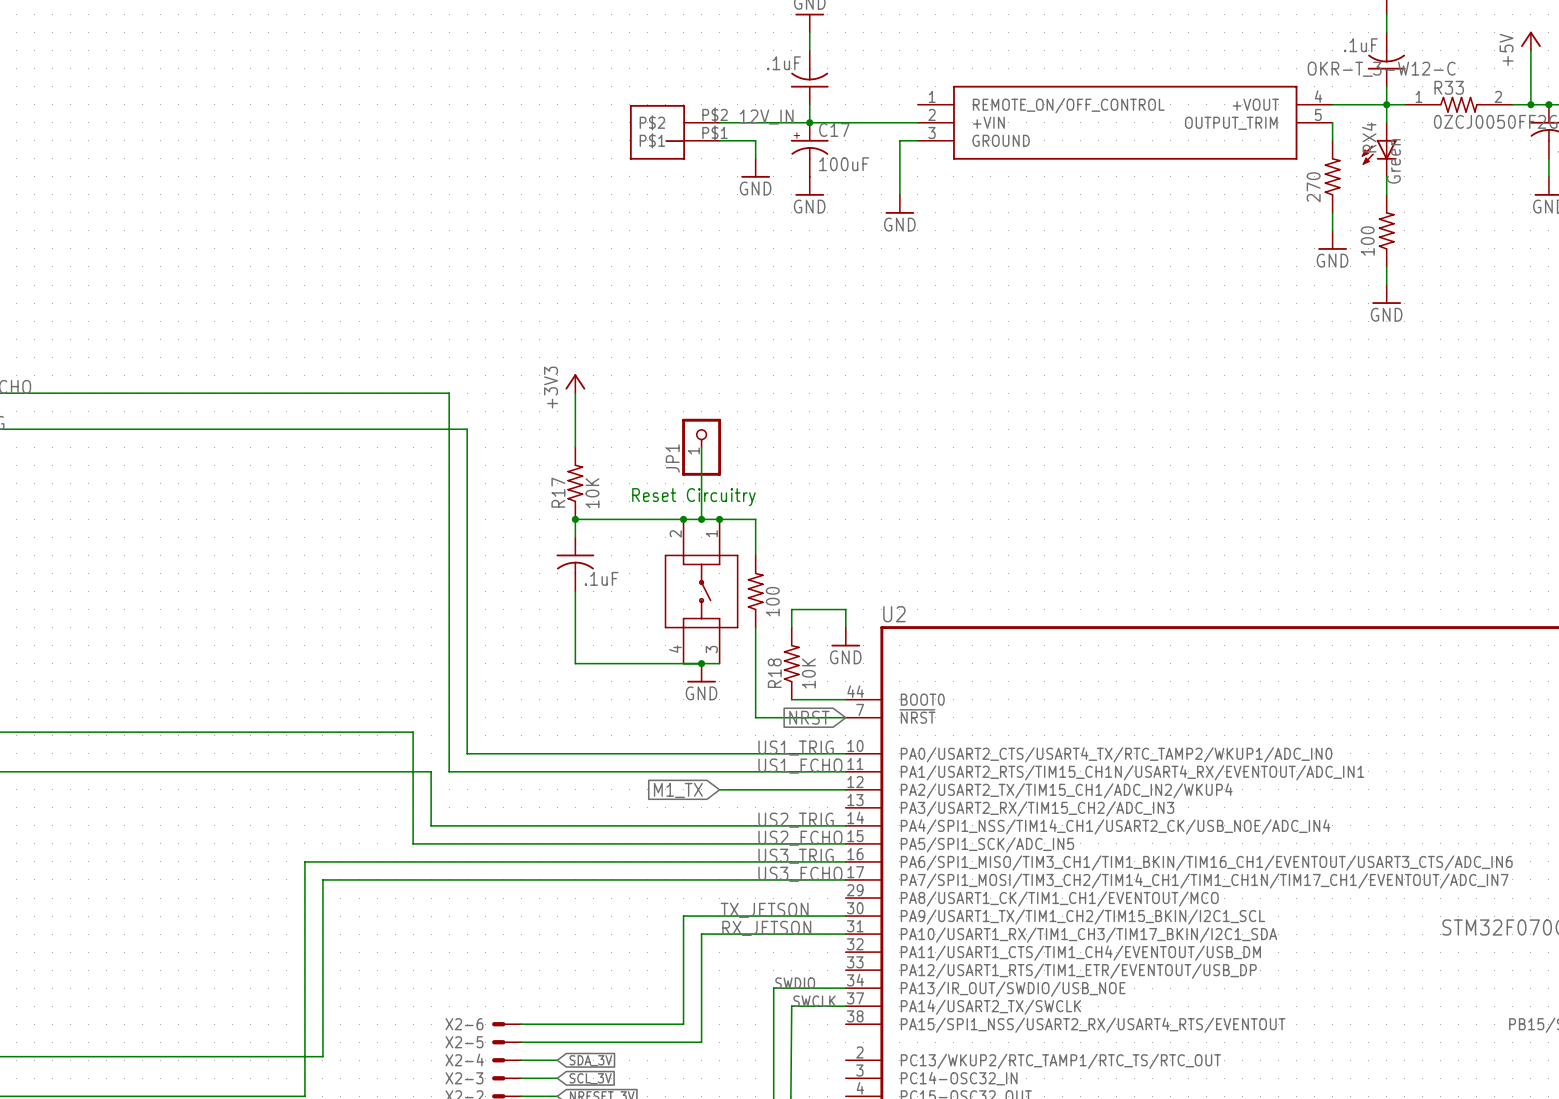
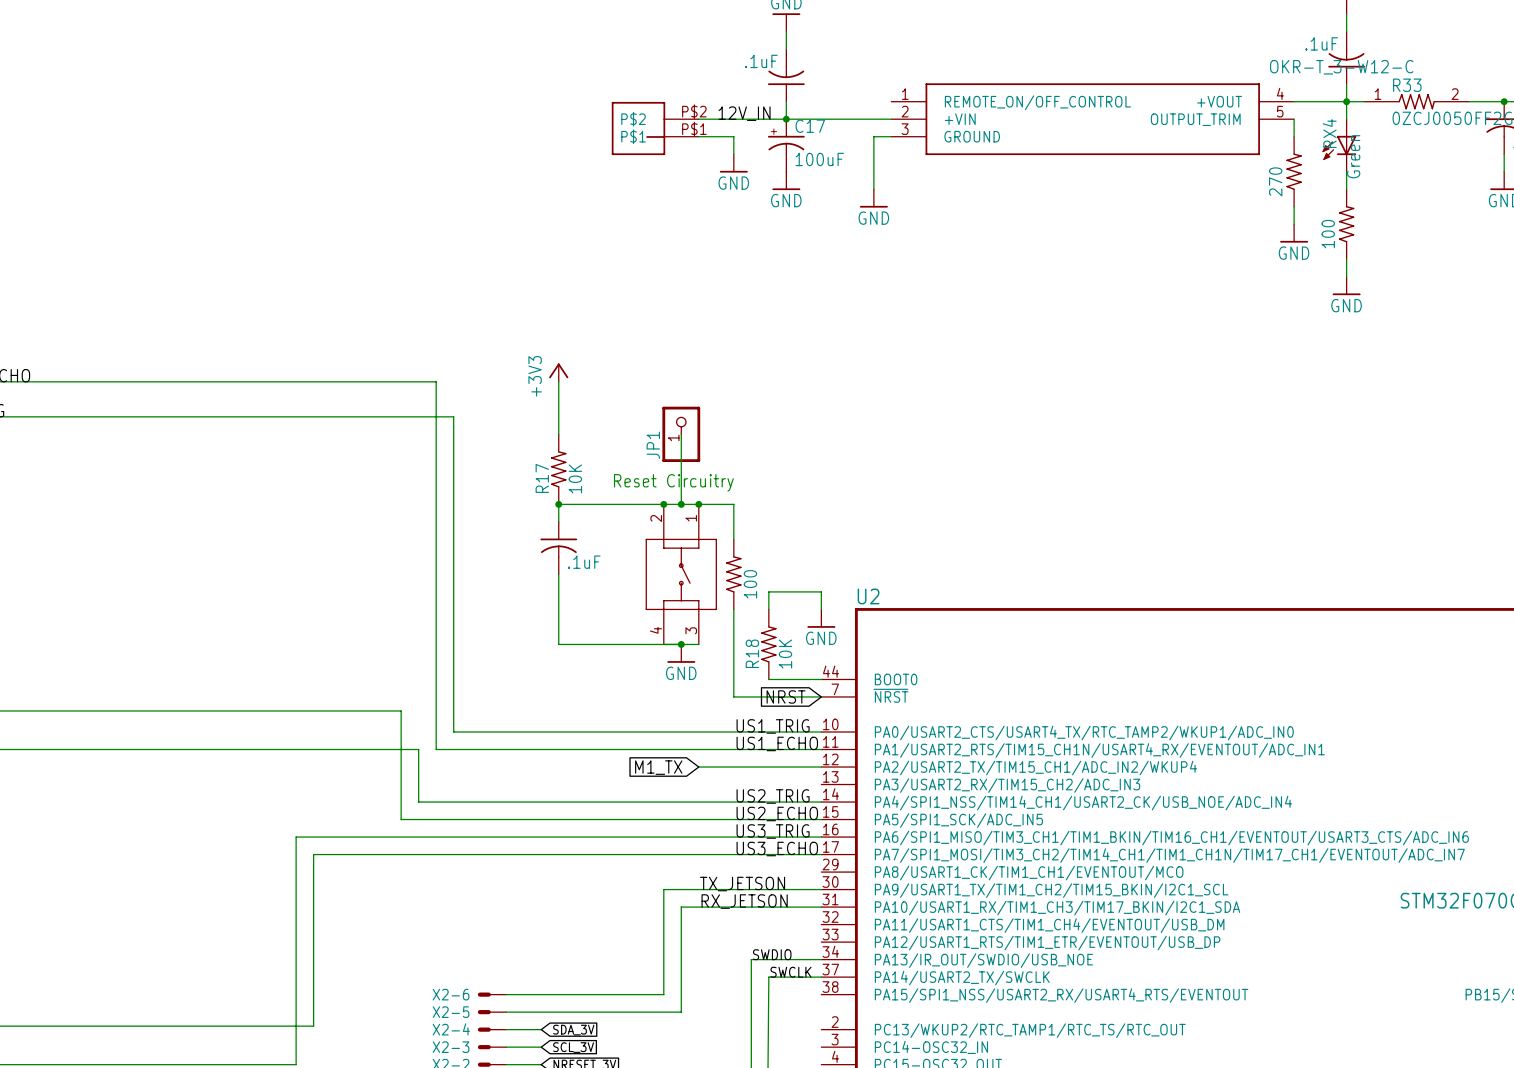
power symbol: +5V (1530, 41) -> none
wire: (1530, 50) (1530, 104) -> none
junction: (1530, 104) -> none

